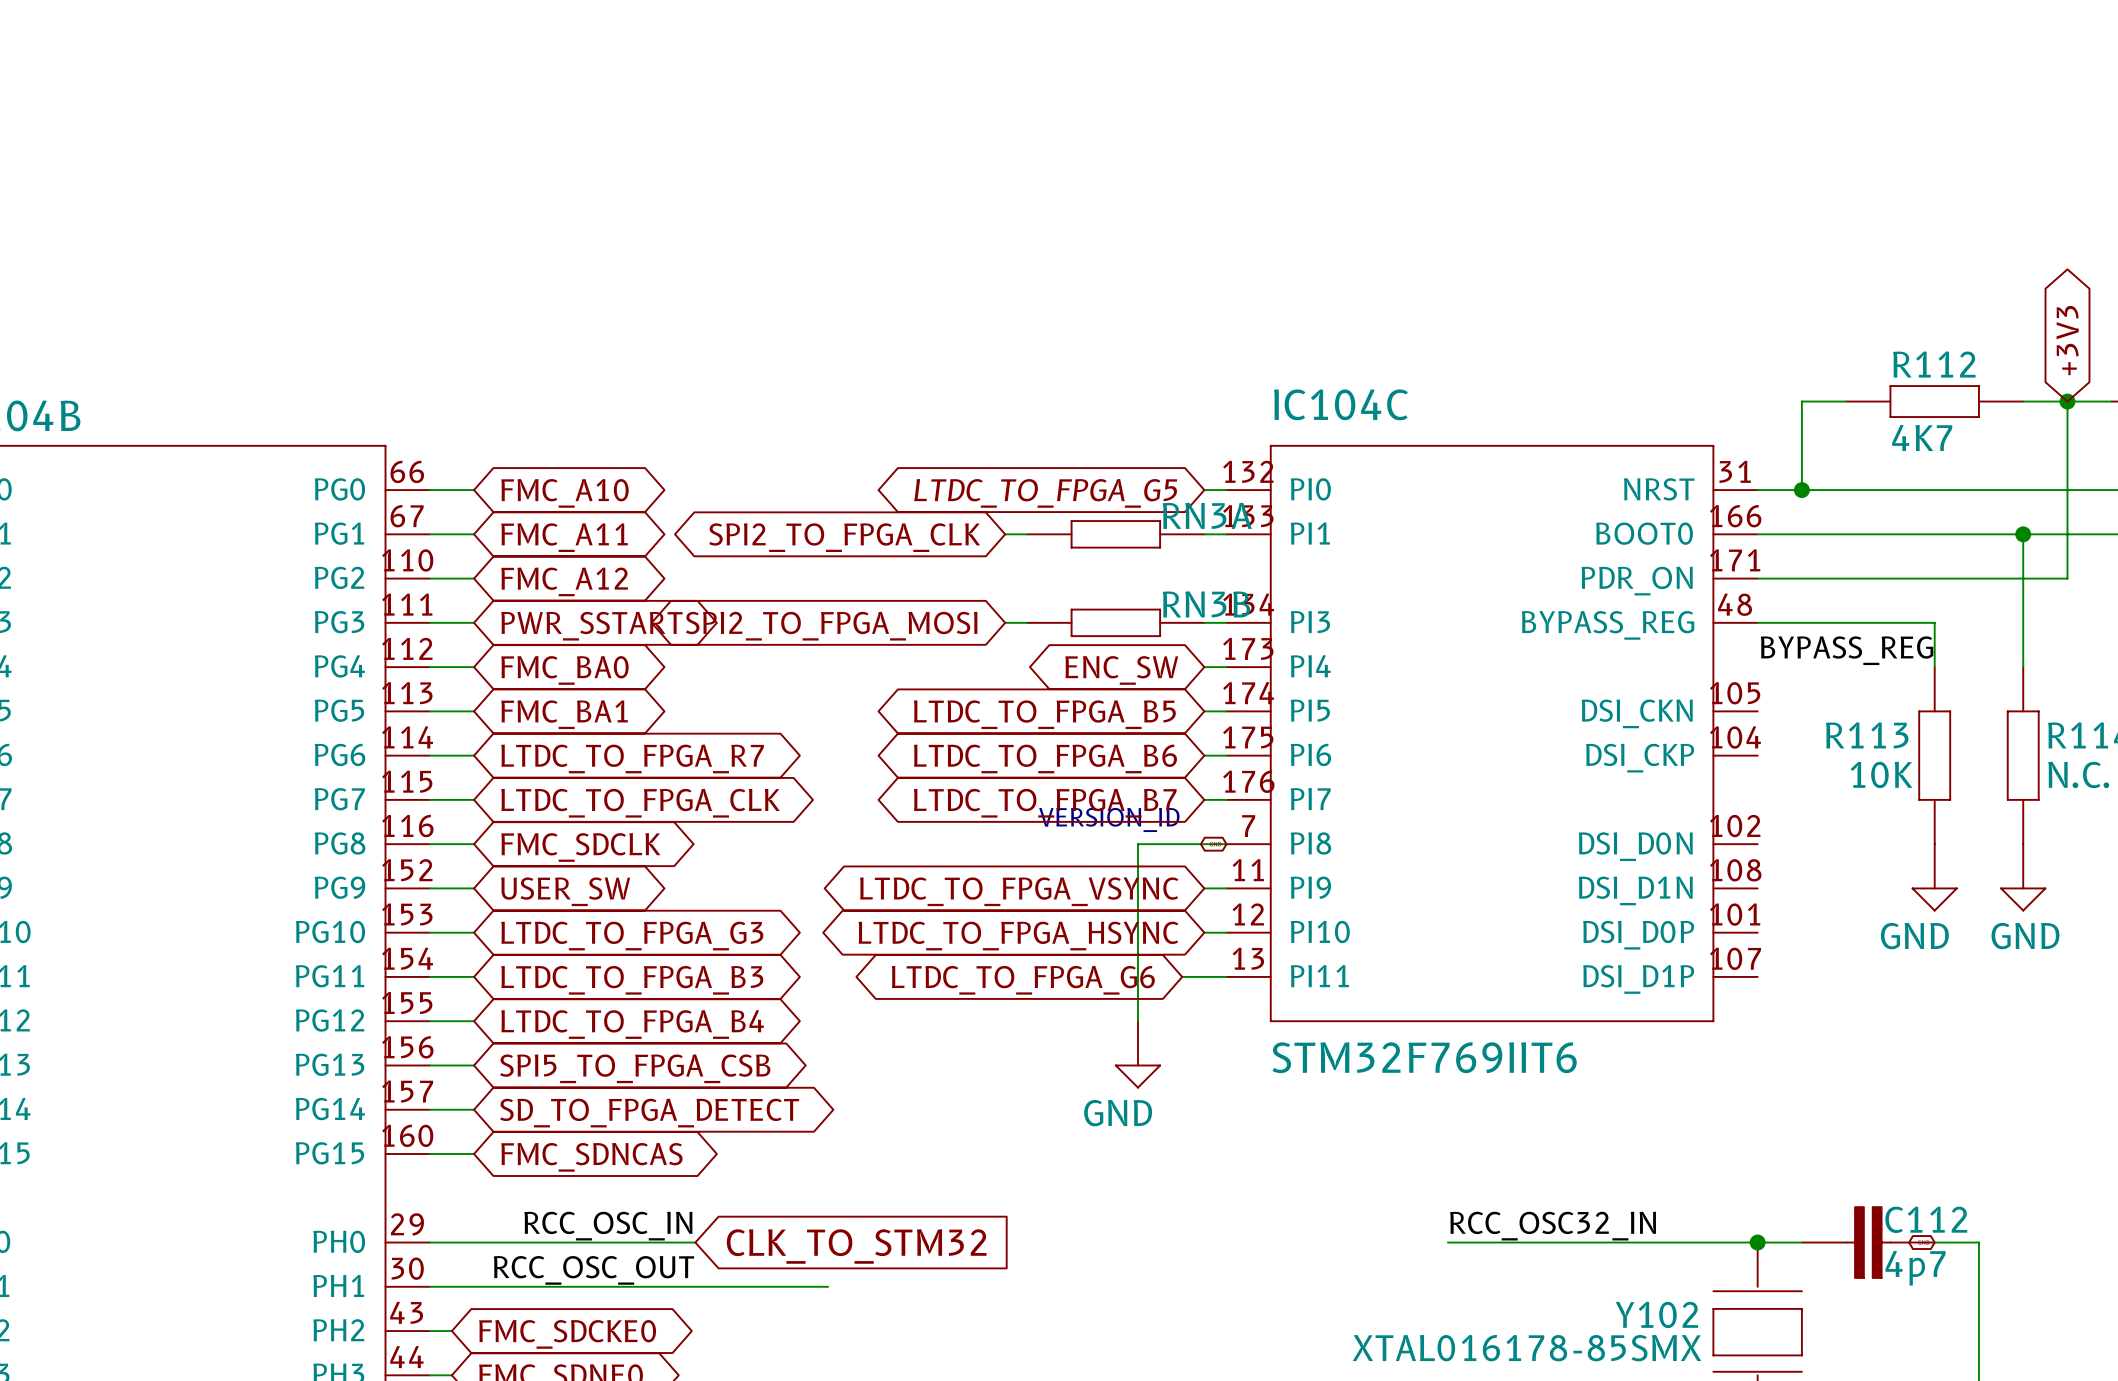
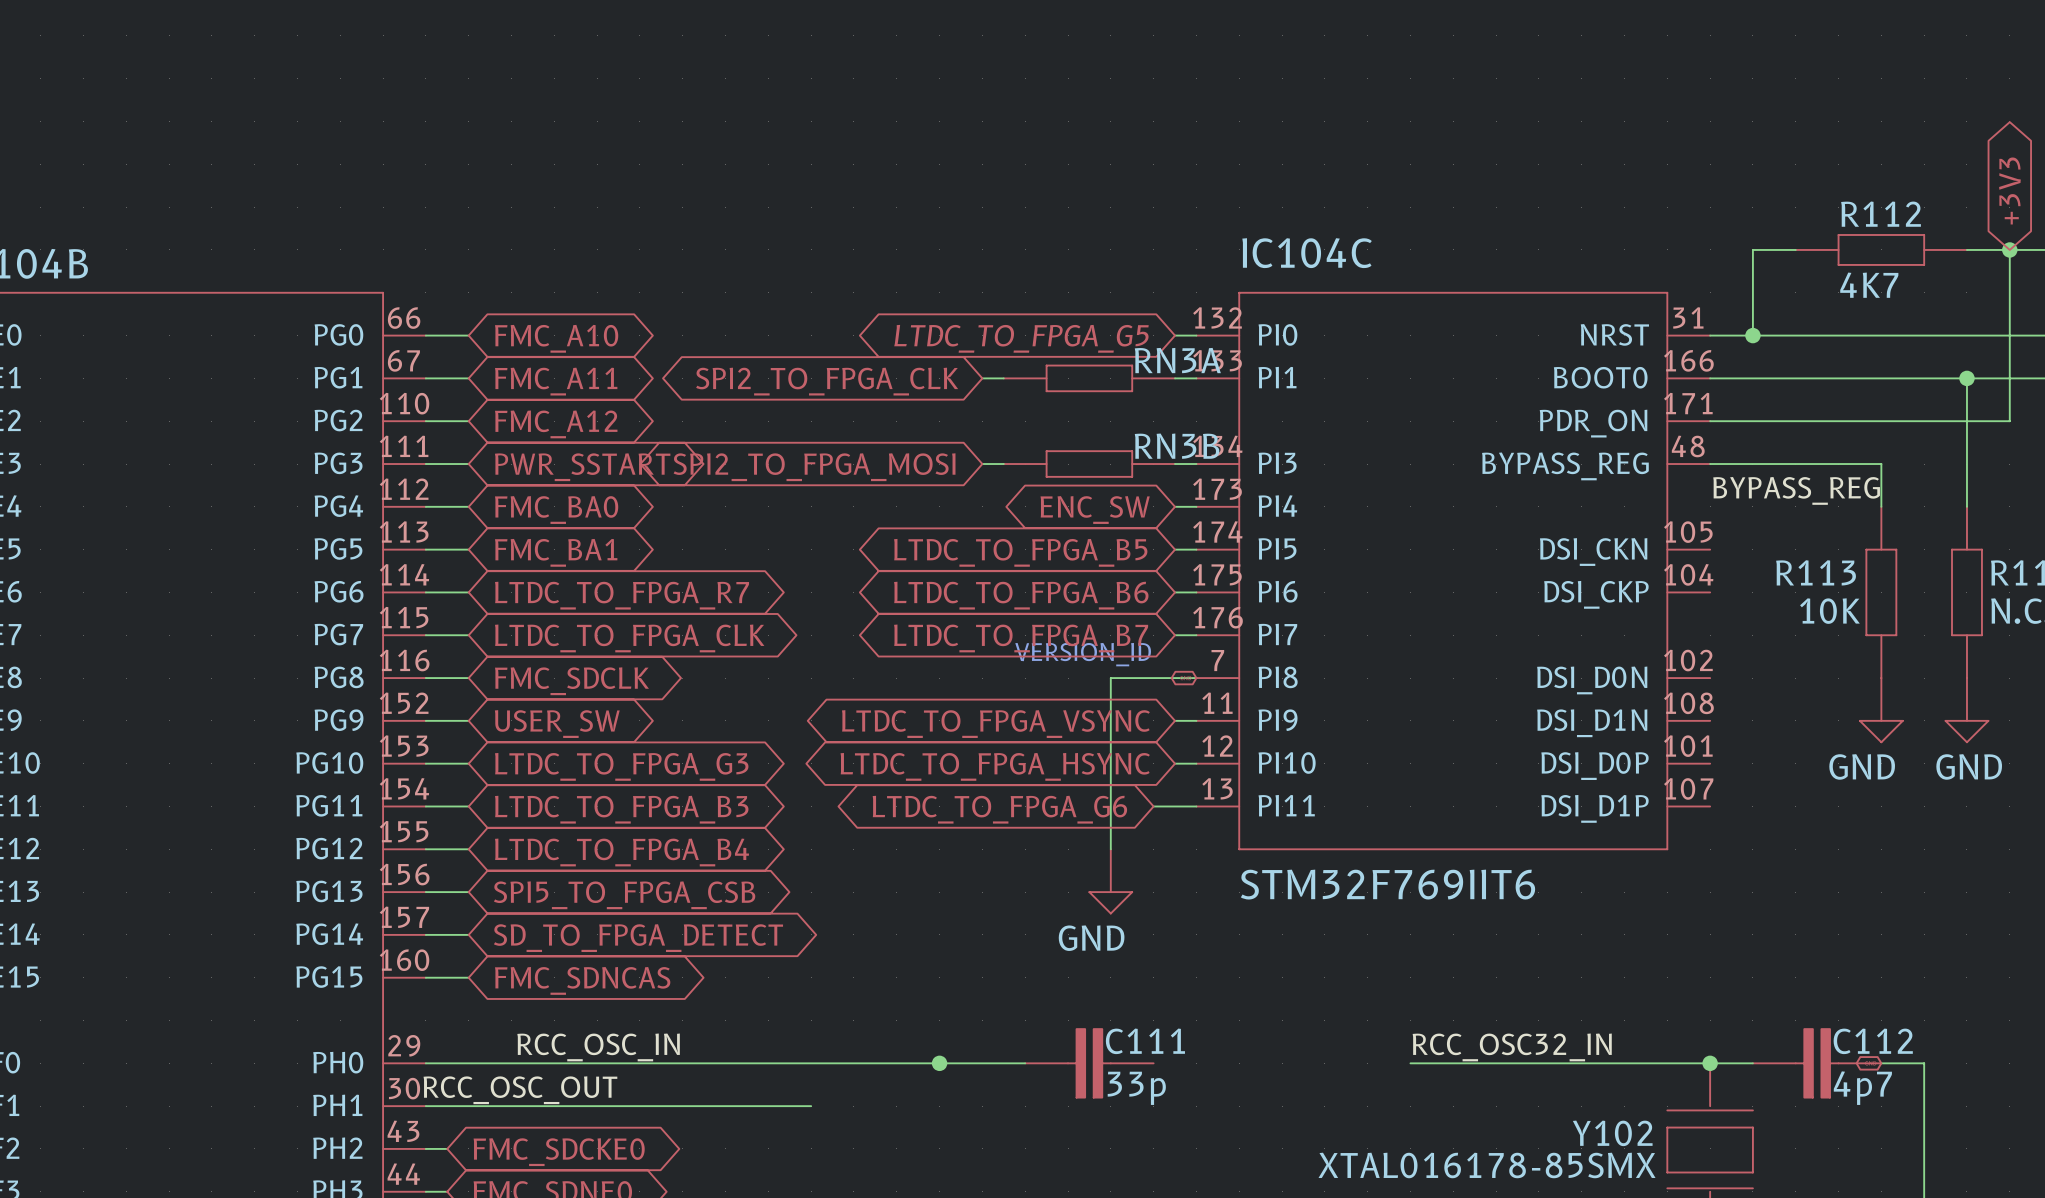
wire: none -> (682, 1063) (1025, 1063)
junction: none -> (939, 1063)
C111: none -> 33p (1089, 1063)
global label: CLK_TO_STM32 (856, 1246) -> none
label position: RCC_OSC_OUT (593, 1270) -> RCC_OSC_OUT (520, 1090)

